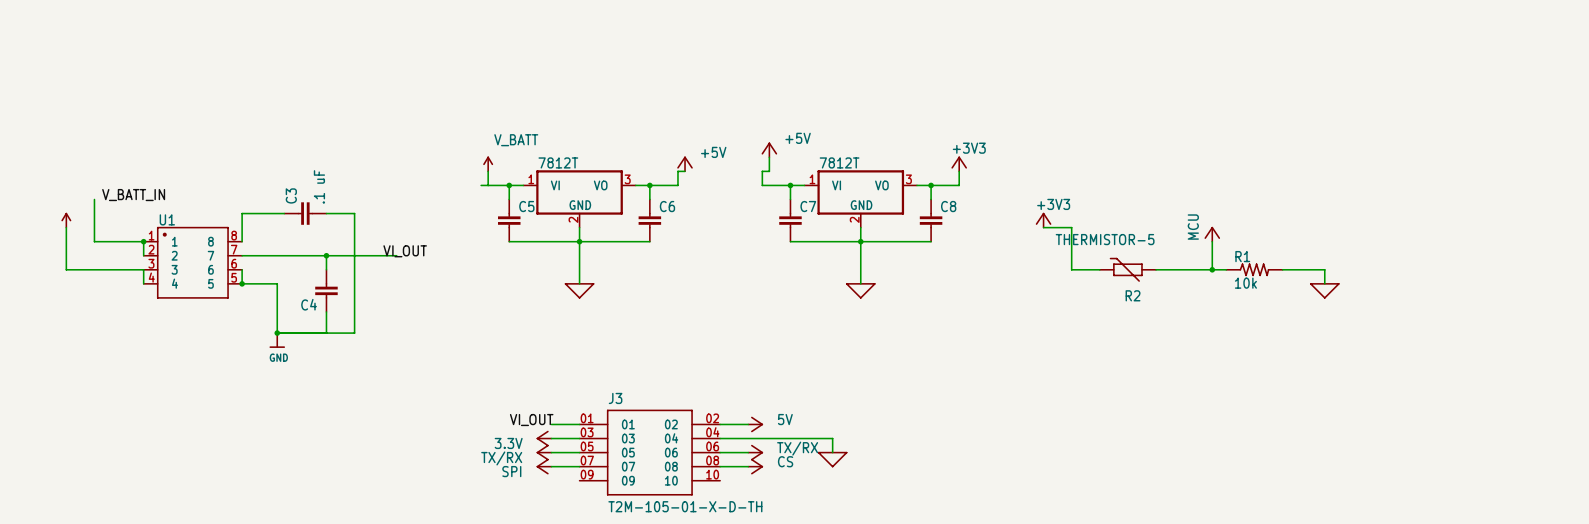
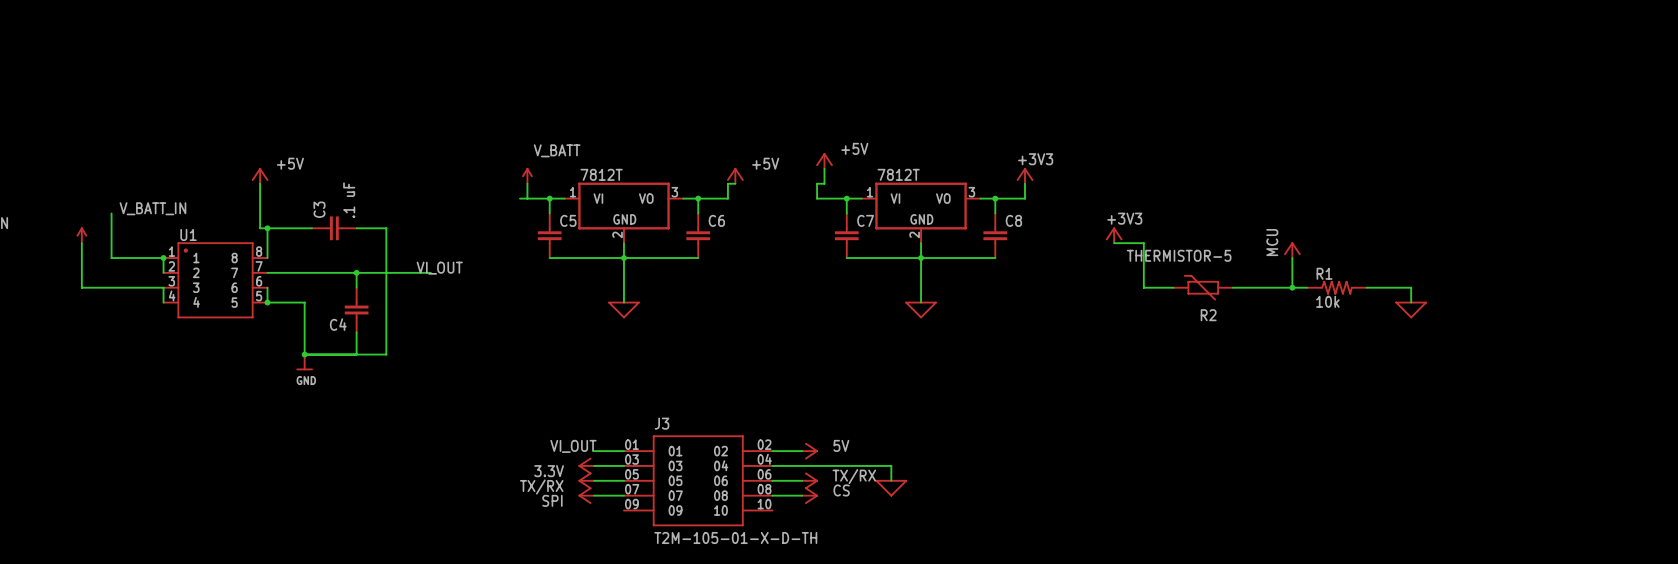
power symbol: none -> +5V (260, 175)
wire: none -> (260, 183) (260, 228) (267, 228)
junction: none -> (267, 228)

